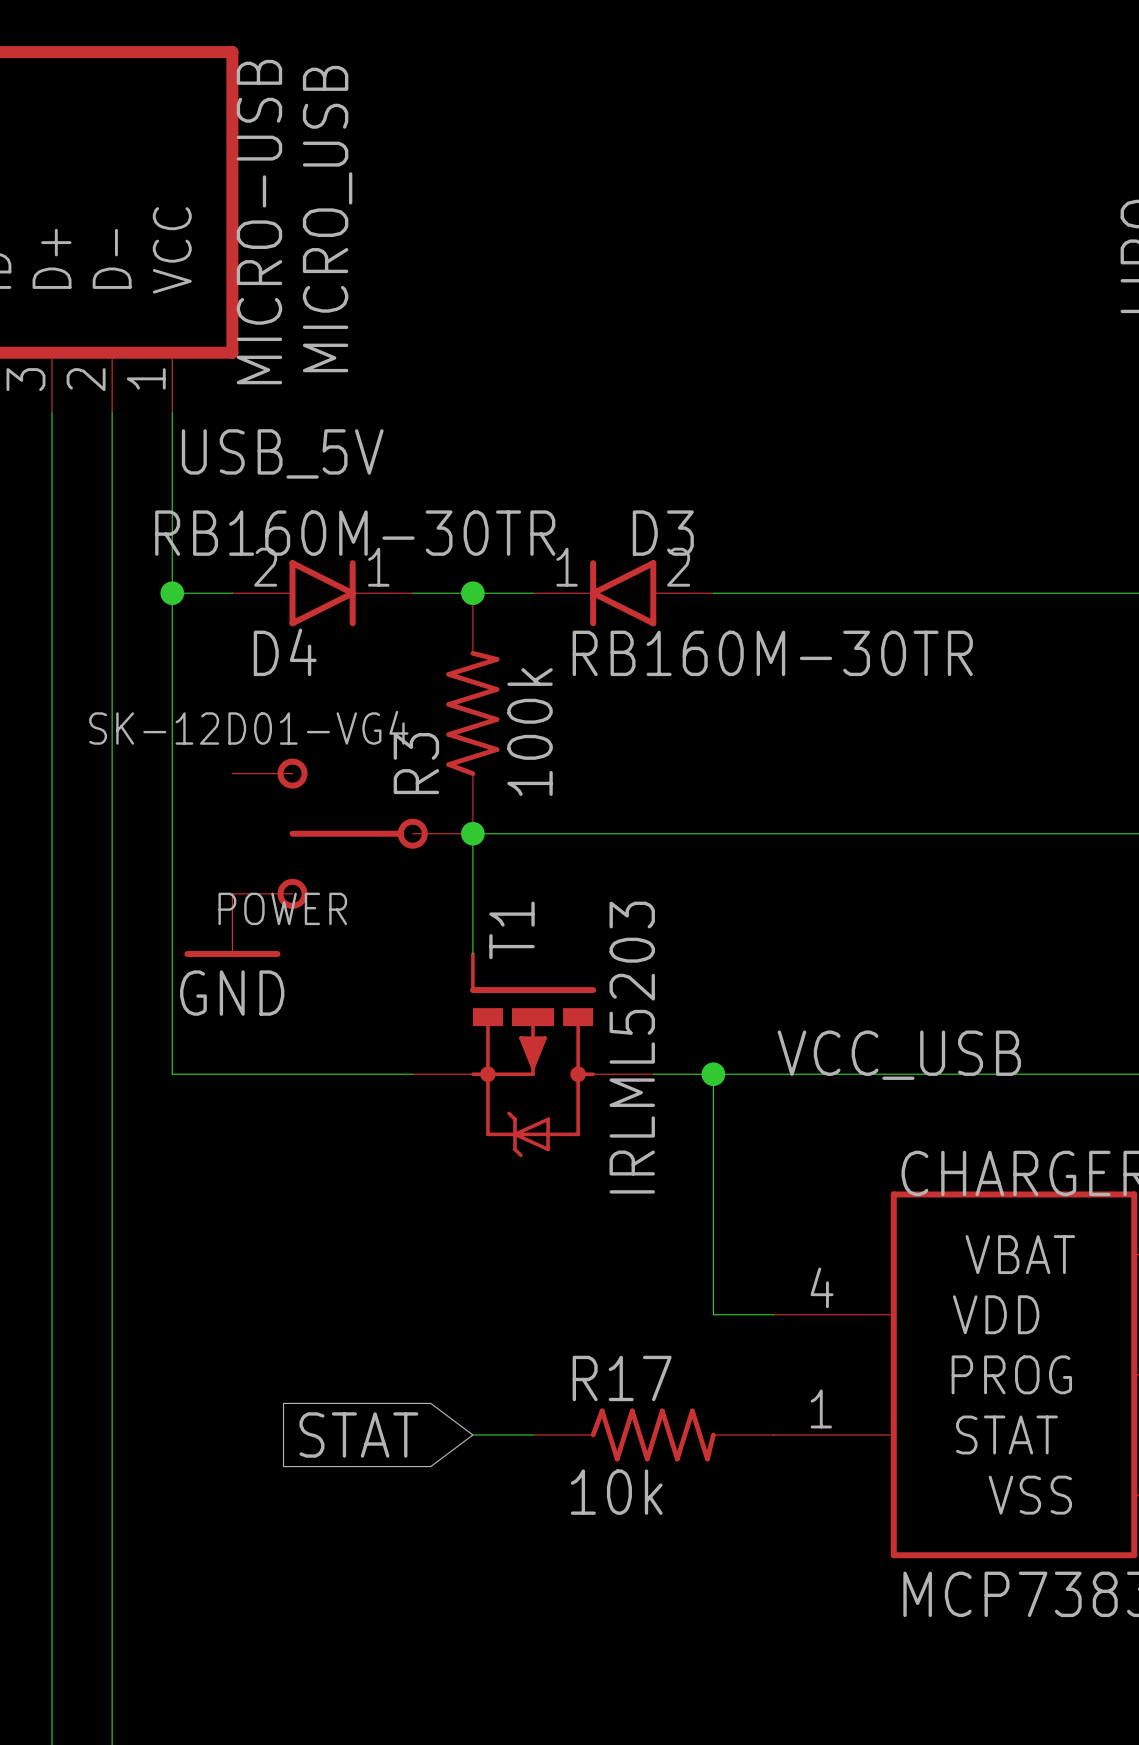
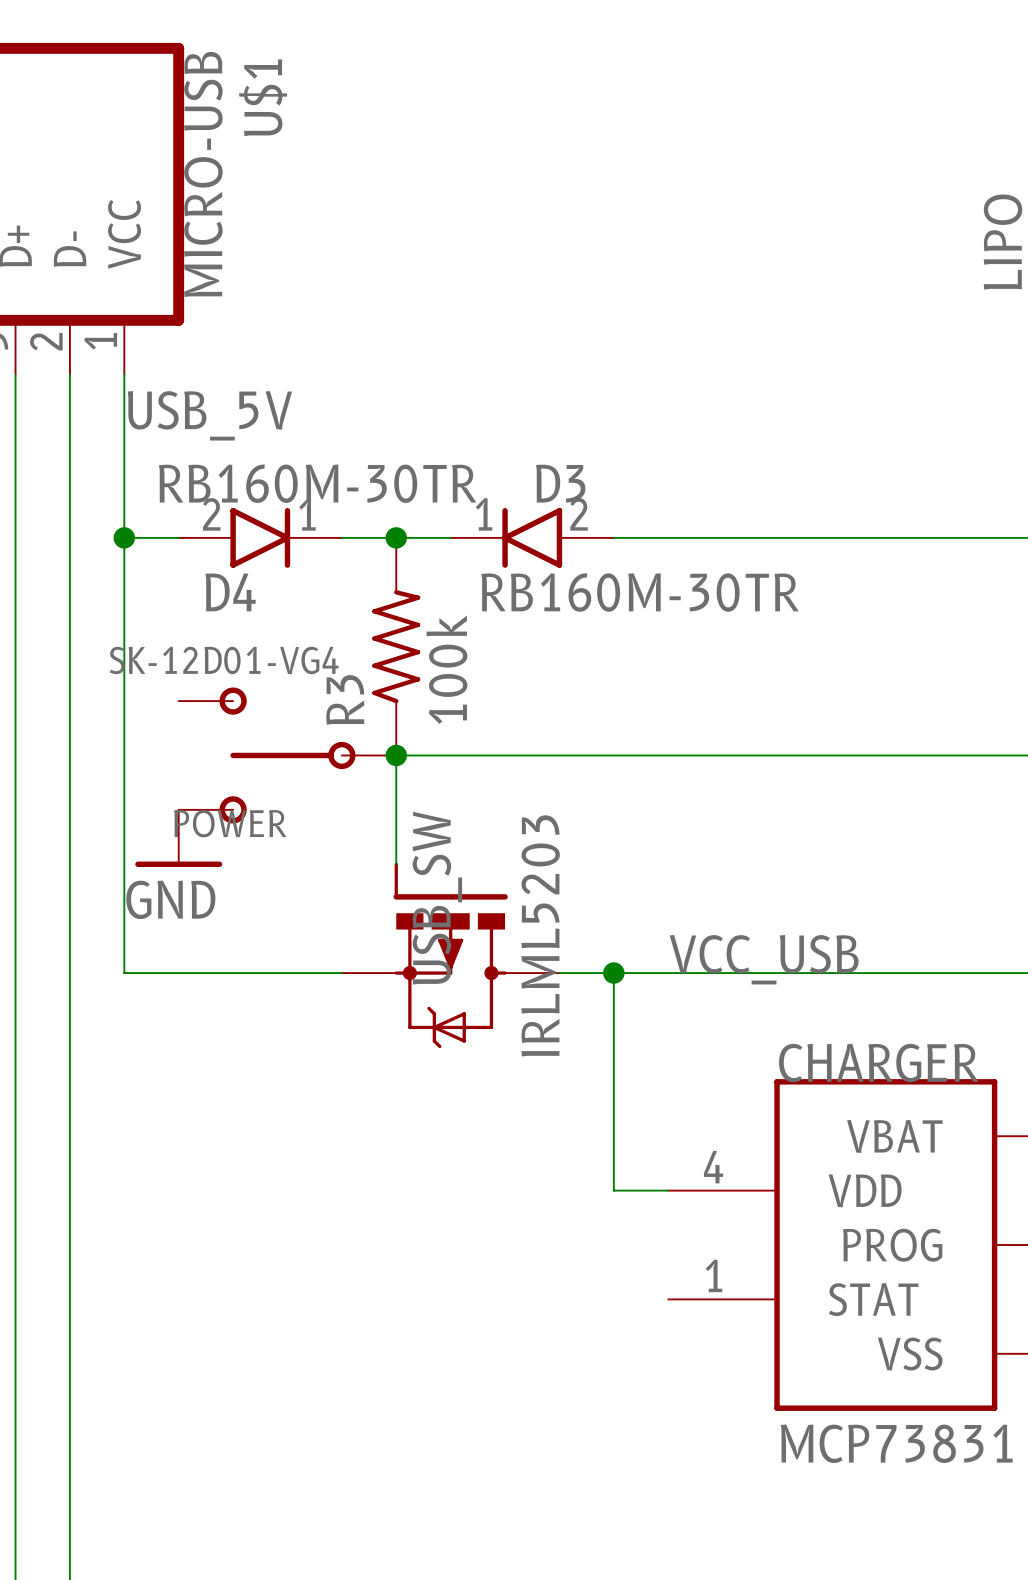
MICRO_USB name: MICRO_USB (327, 219) -> U$1 (263, 97)
T1 name: T1 (511, 930) -> USB_SW (437, 898)
global label: STAT (358, 1434) -> none
wire: (472, 1434) (533, 1434) -> none
R17: 10k (653, 1434) -> none

